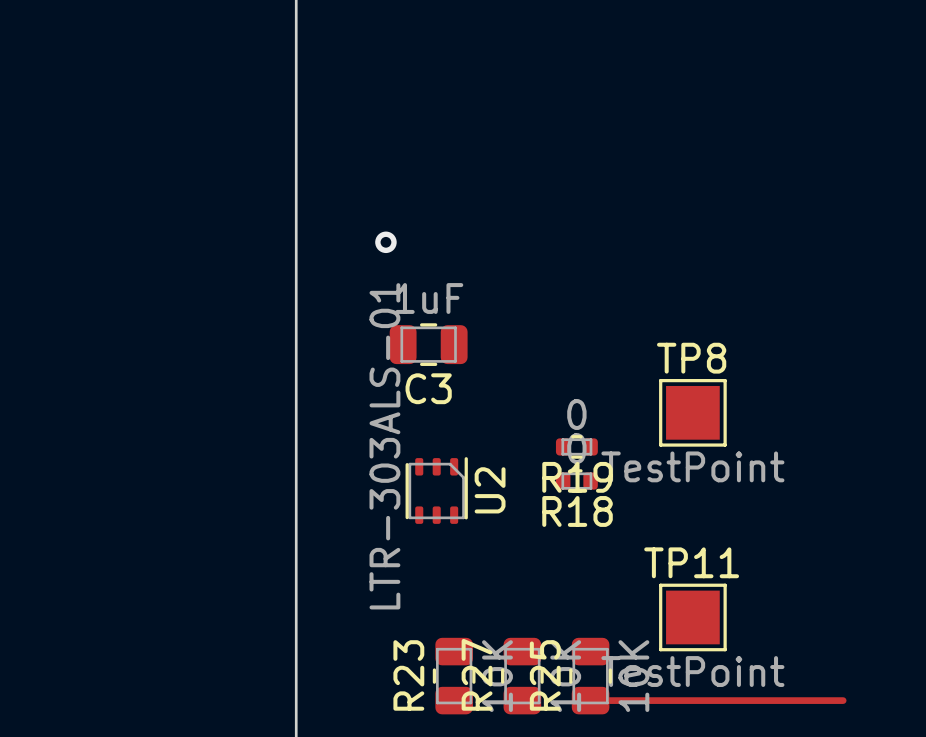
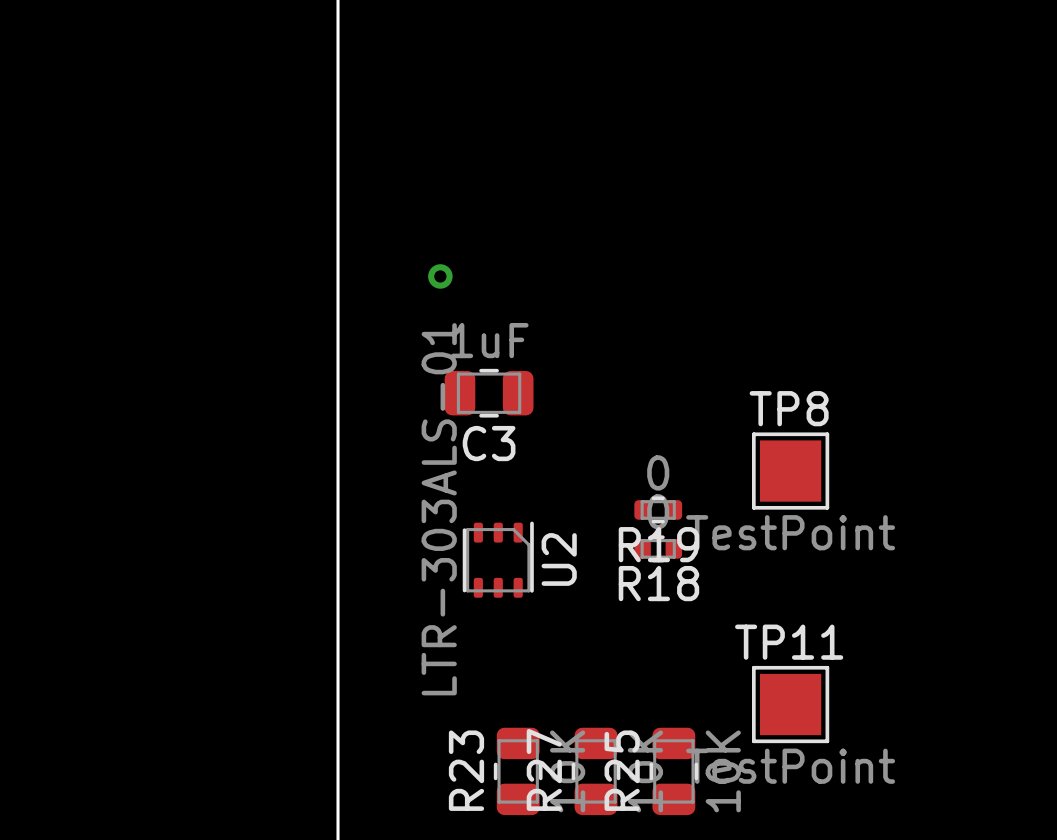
top track: (590, 700) (843, 700) -> none

